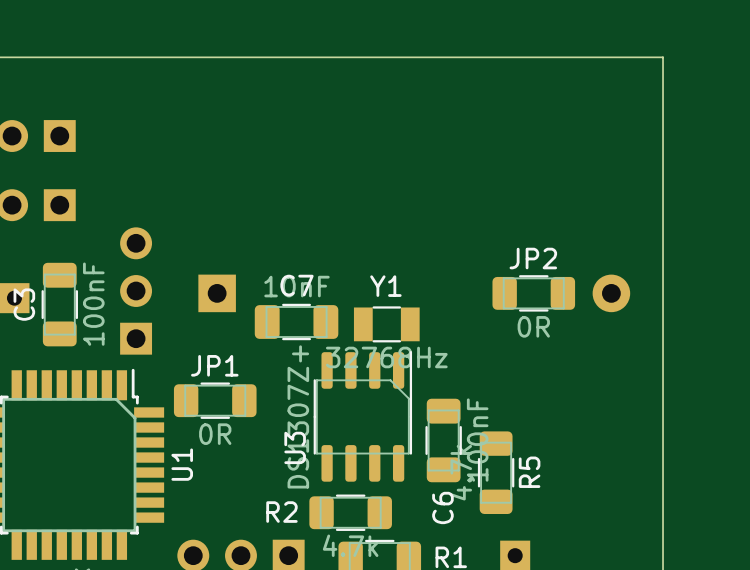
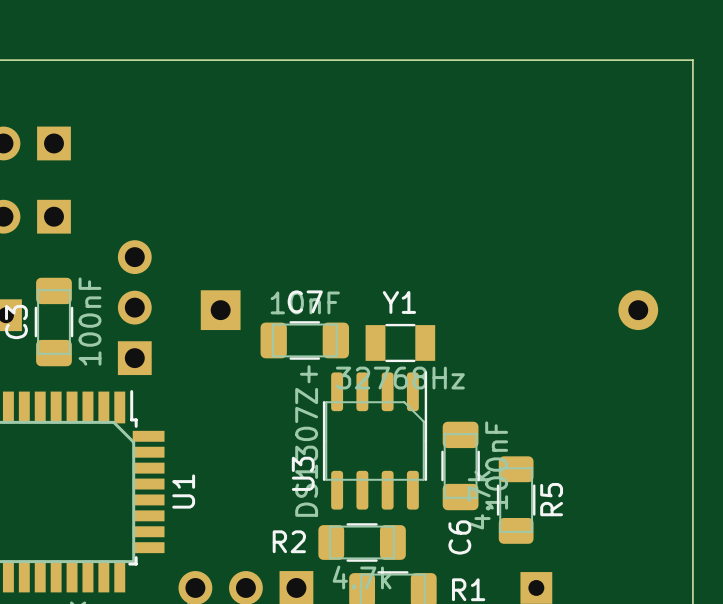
JP2: 0R (533, 293) -> none
JP1: 0R (215, 400) -> none

